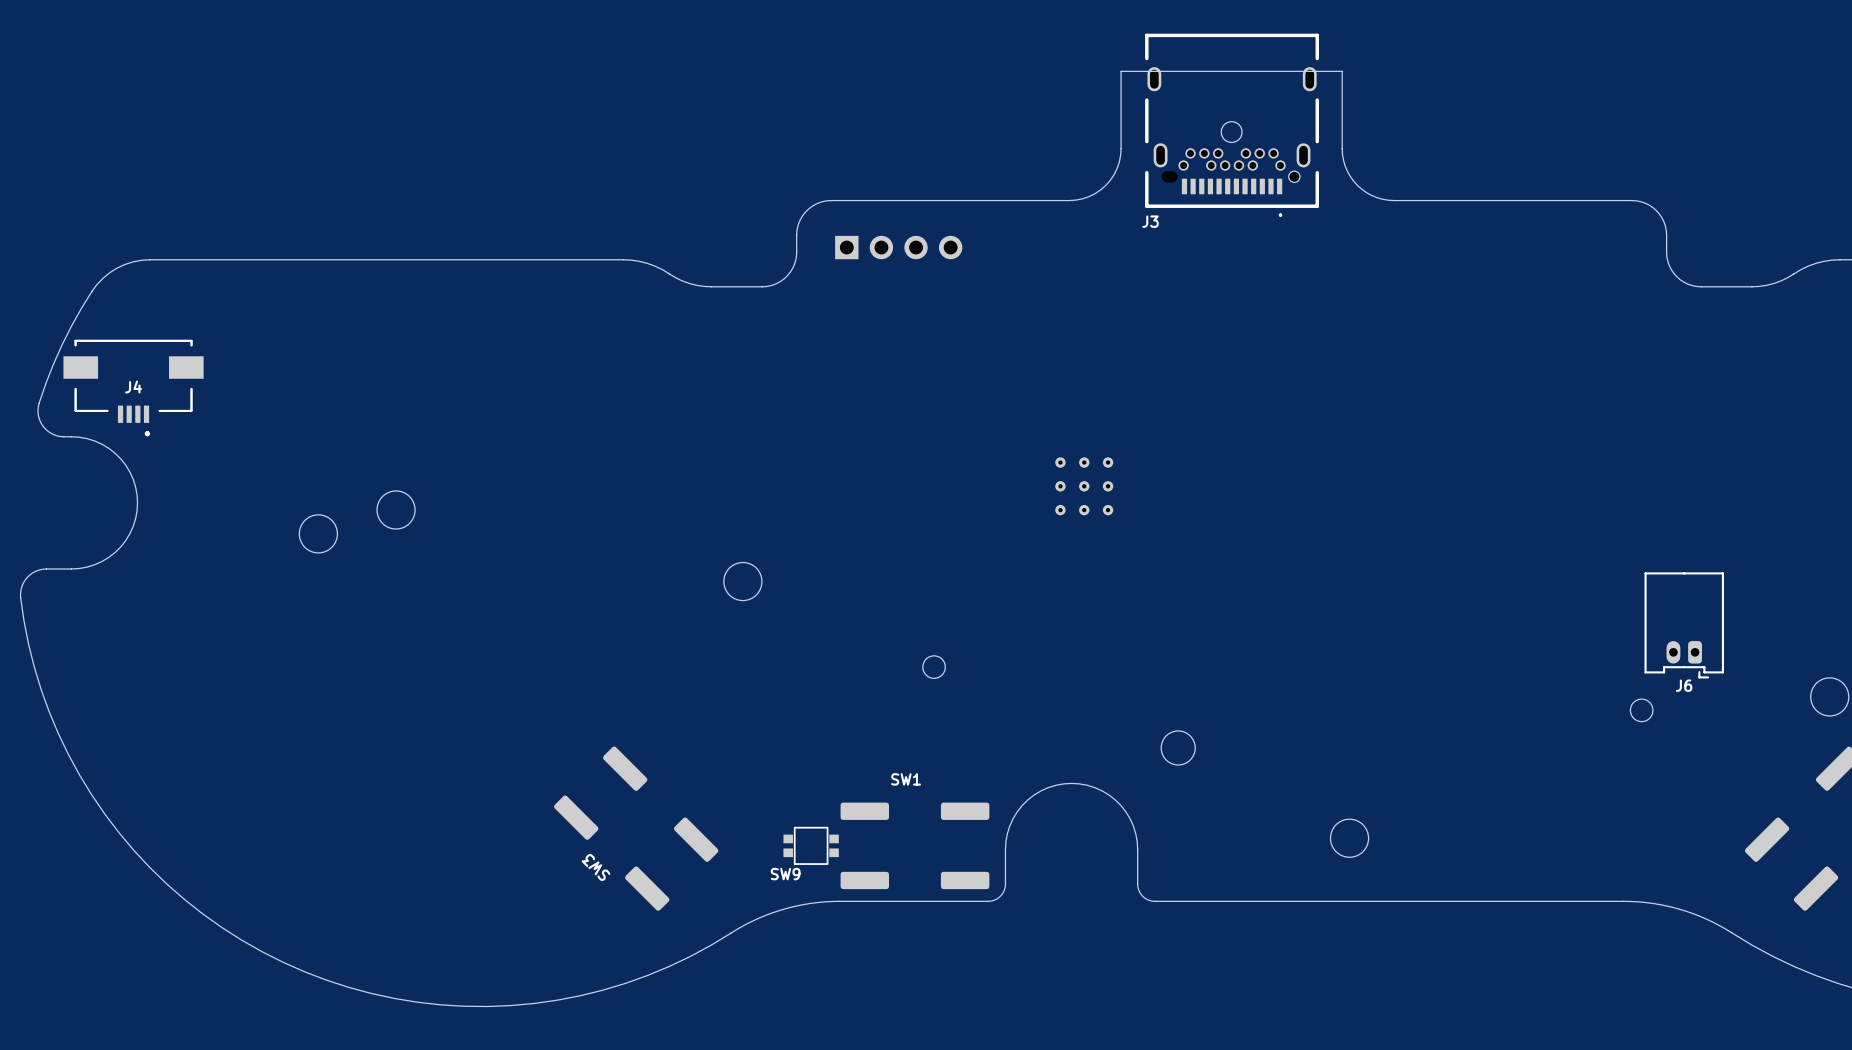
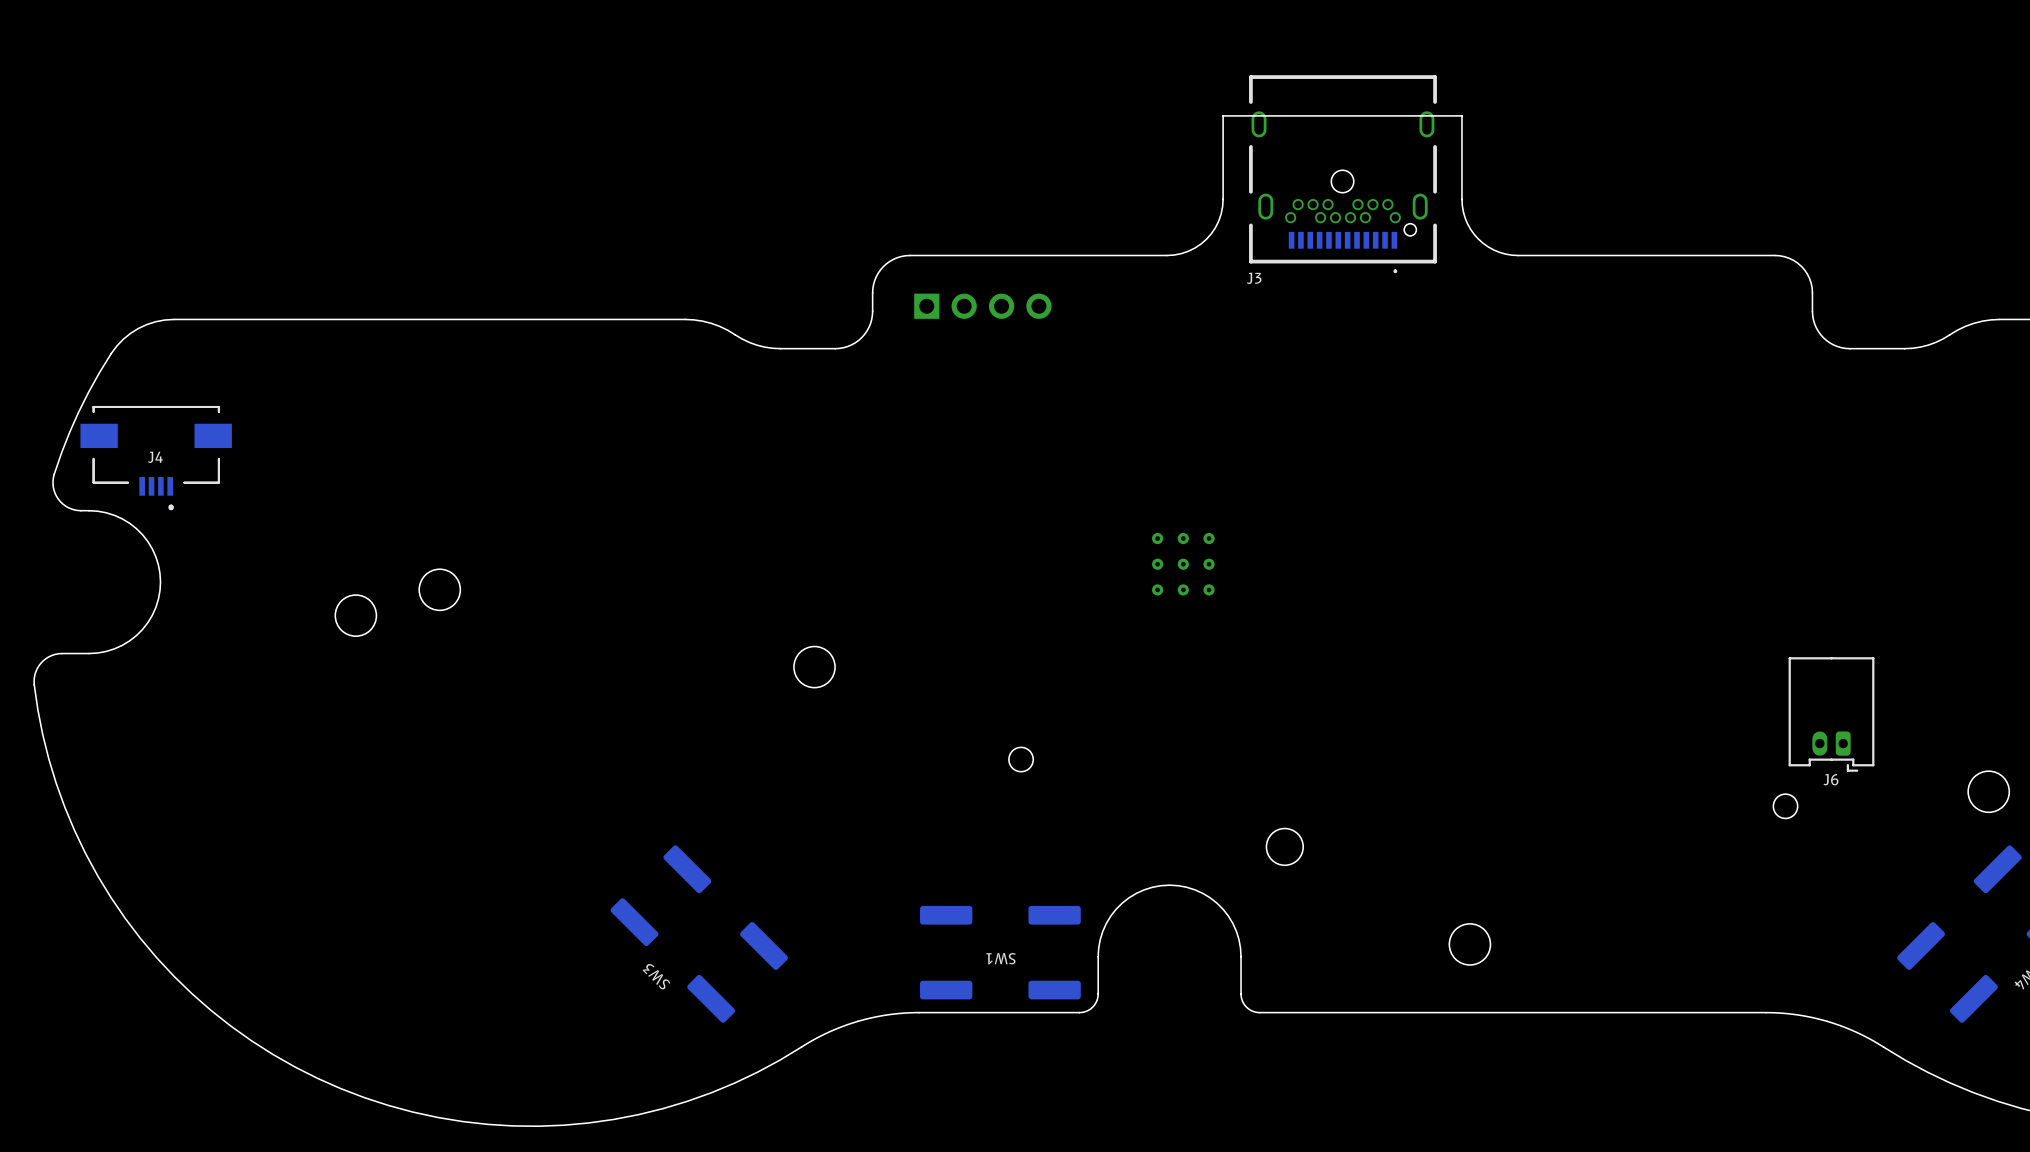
SW1 name rotation: 0° (906, 779) -> 180° (1001, 958)
SW1 name position: SW1 (906, 779) -> SW1 (1001, 958)
SW9: (811, 845) -> none

